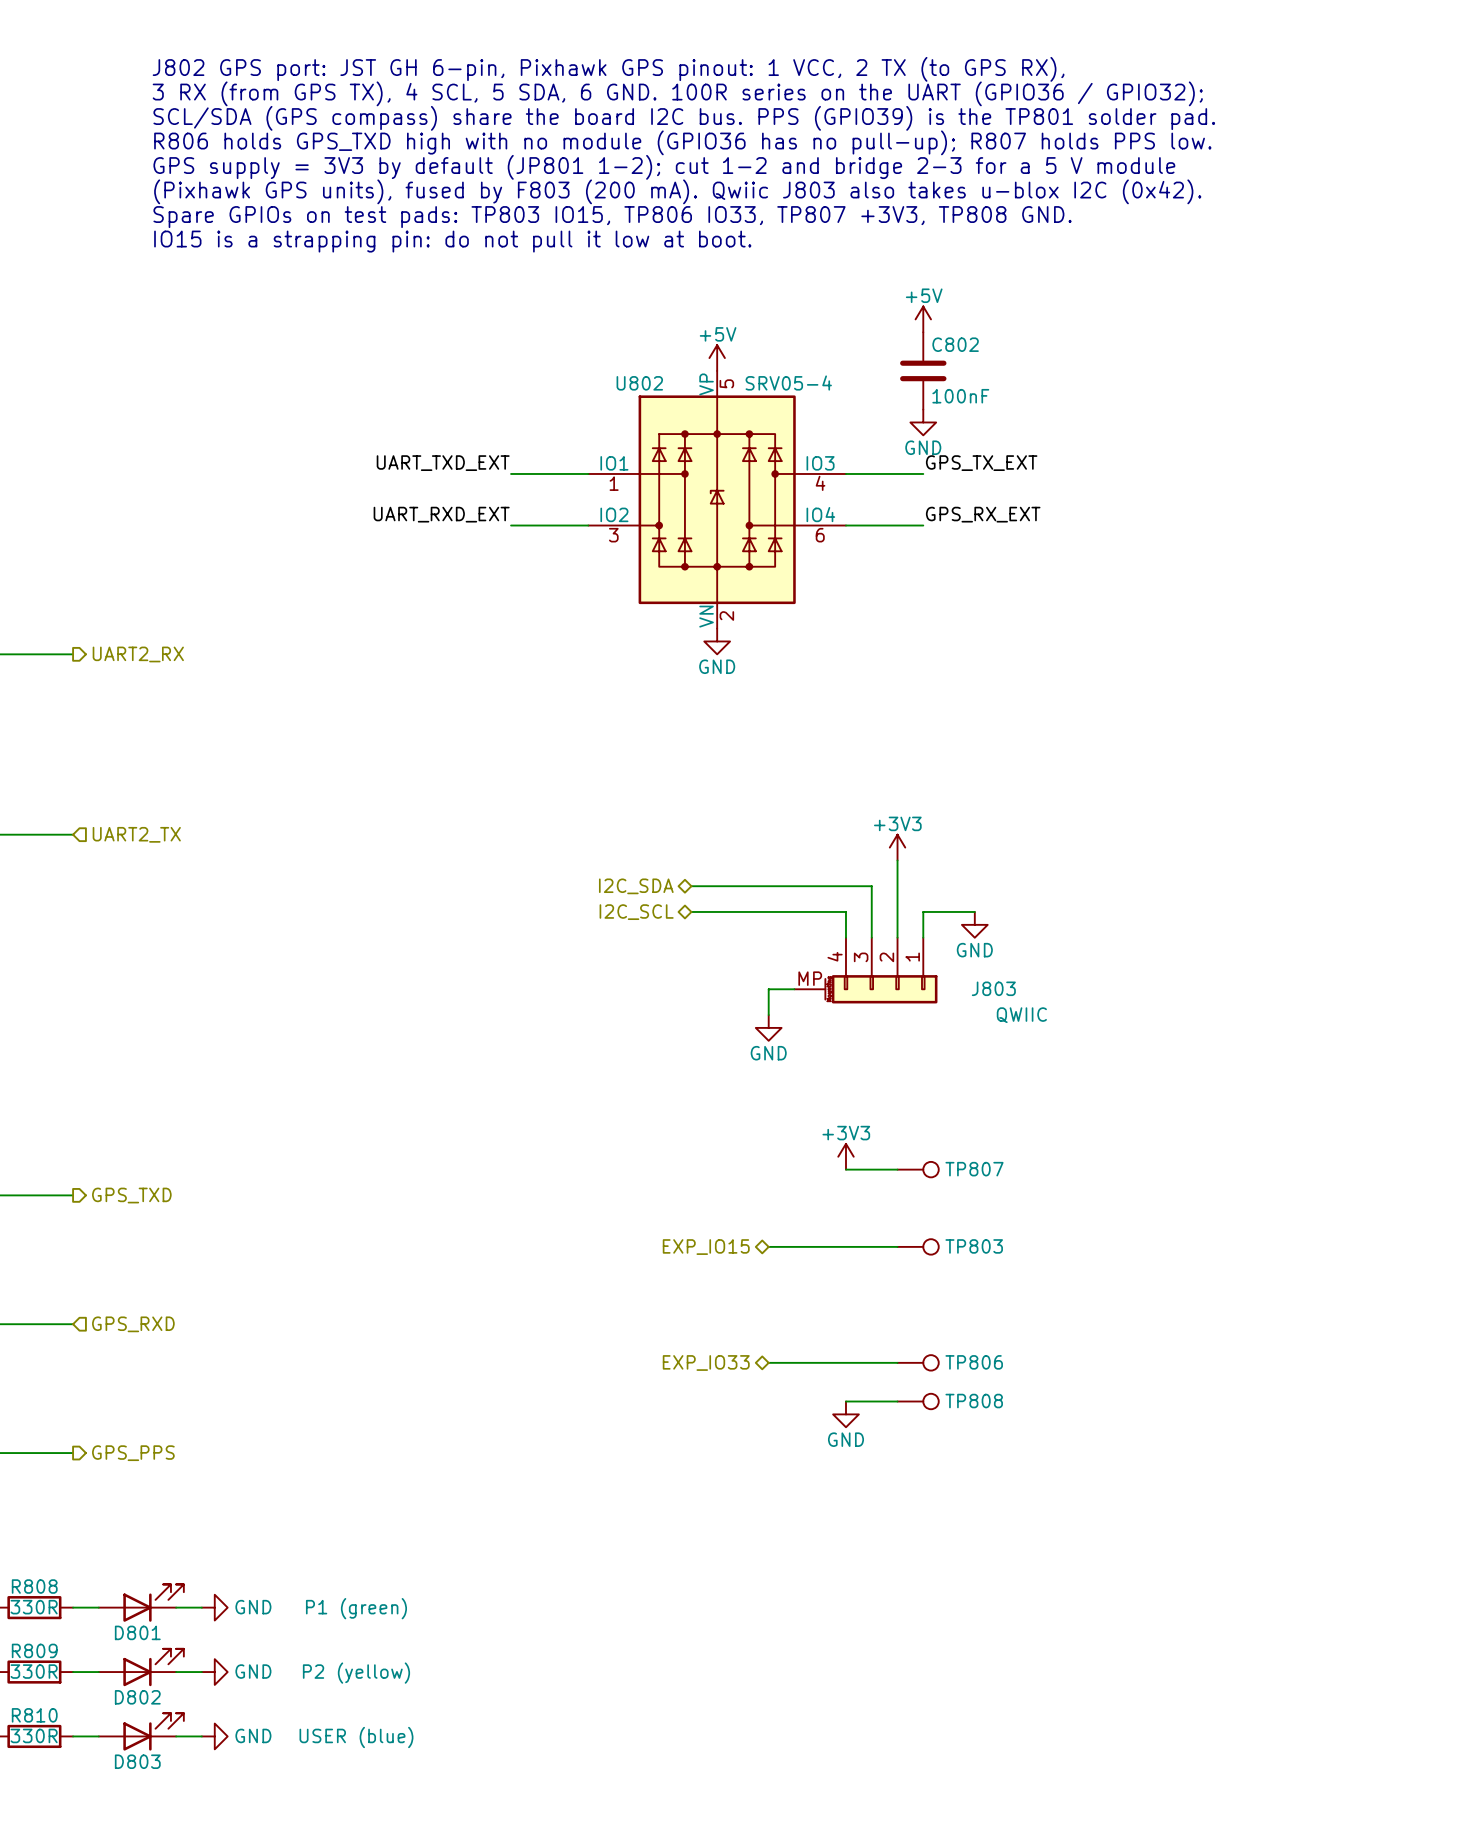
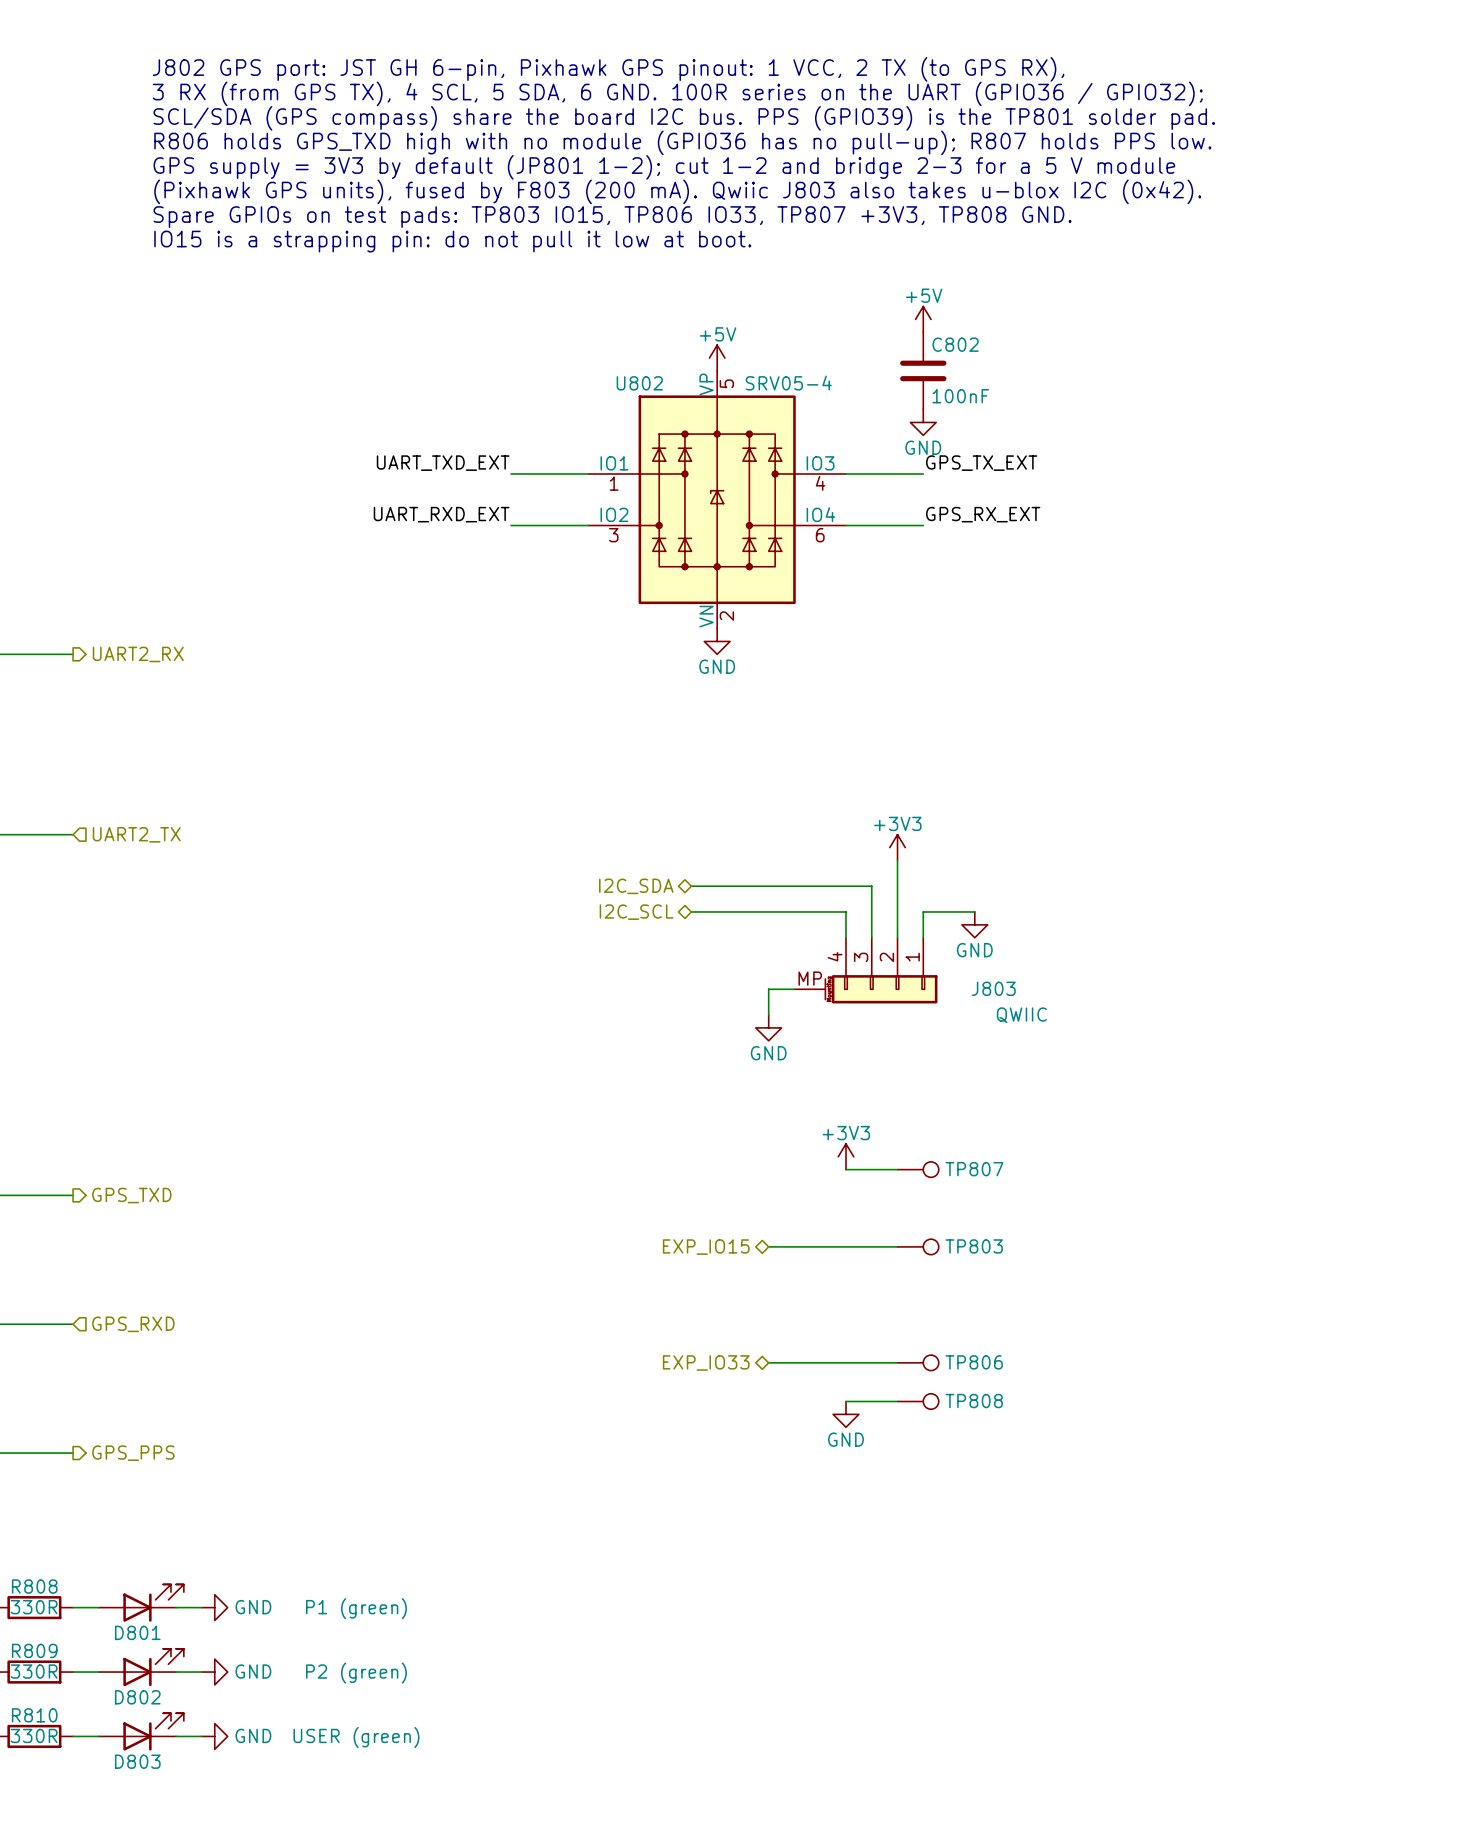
D802 value: P2 (yellow) (356, 1673) -> P2 (green) (356, 1673)
D803 value: USER (blue) (356, 1737) -> USER (green) (356, 1737)

